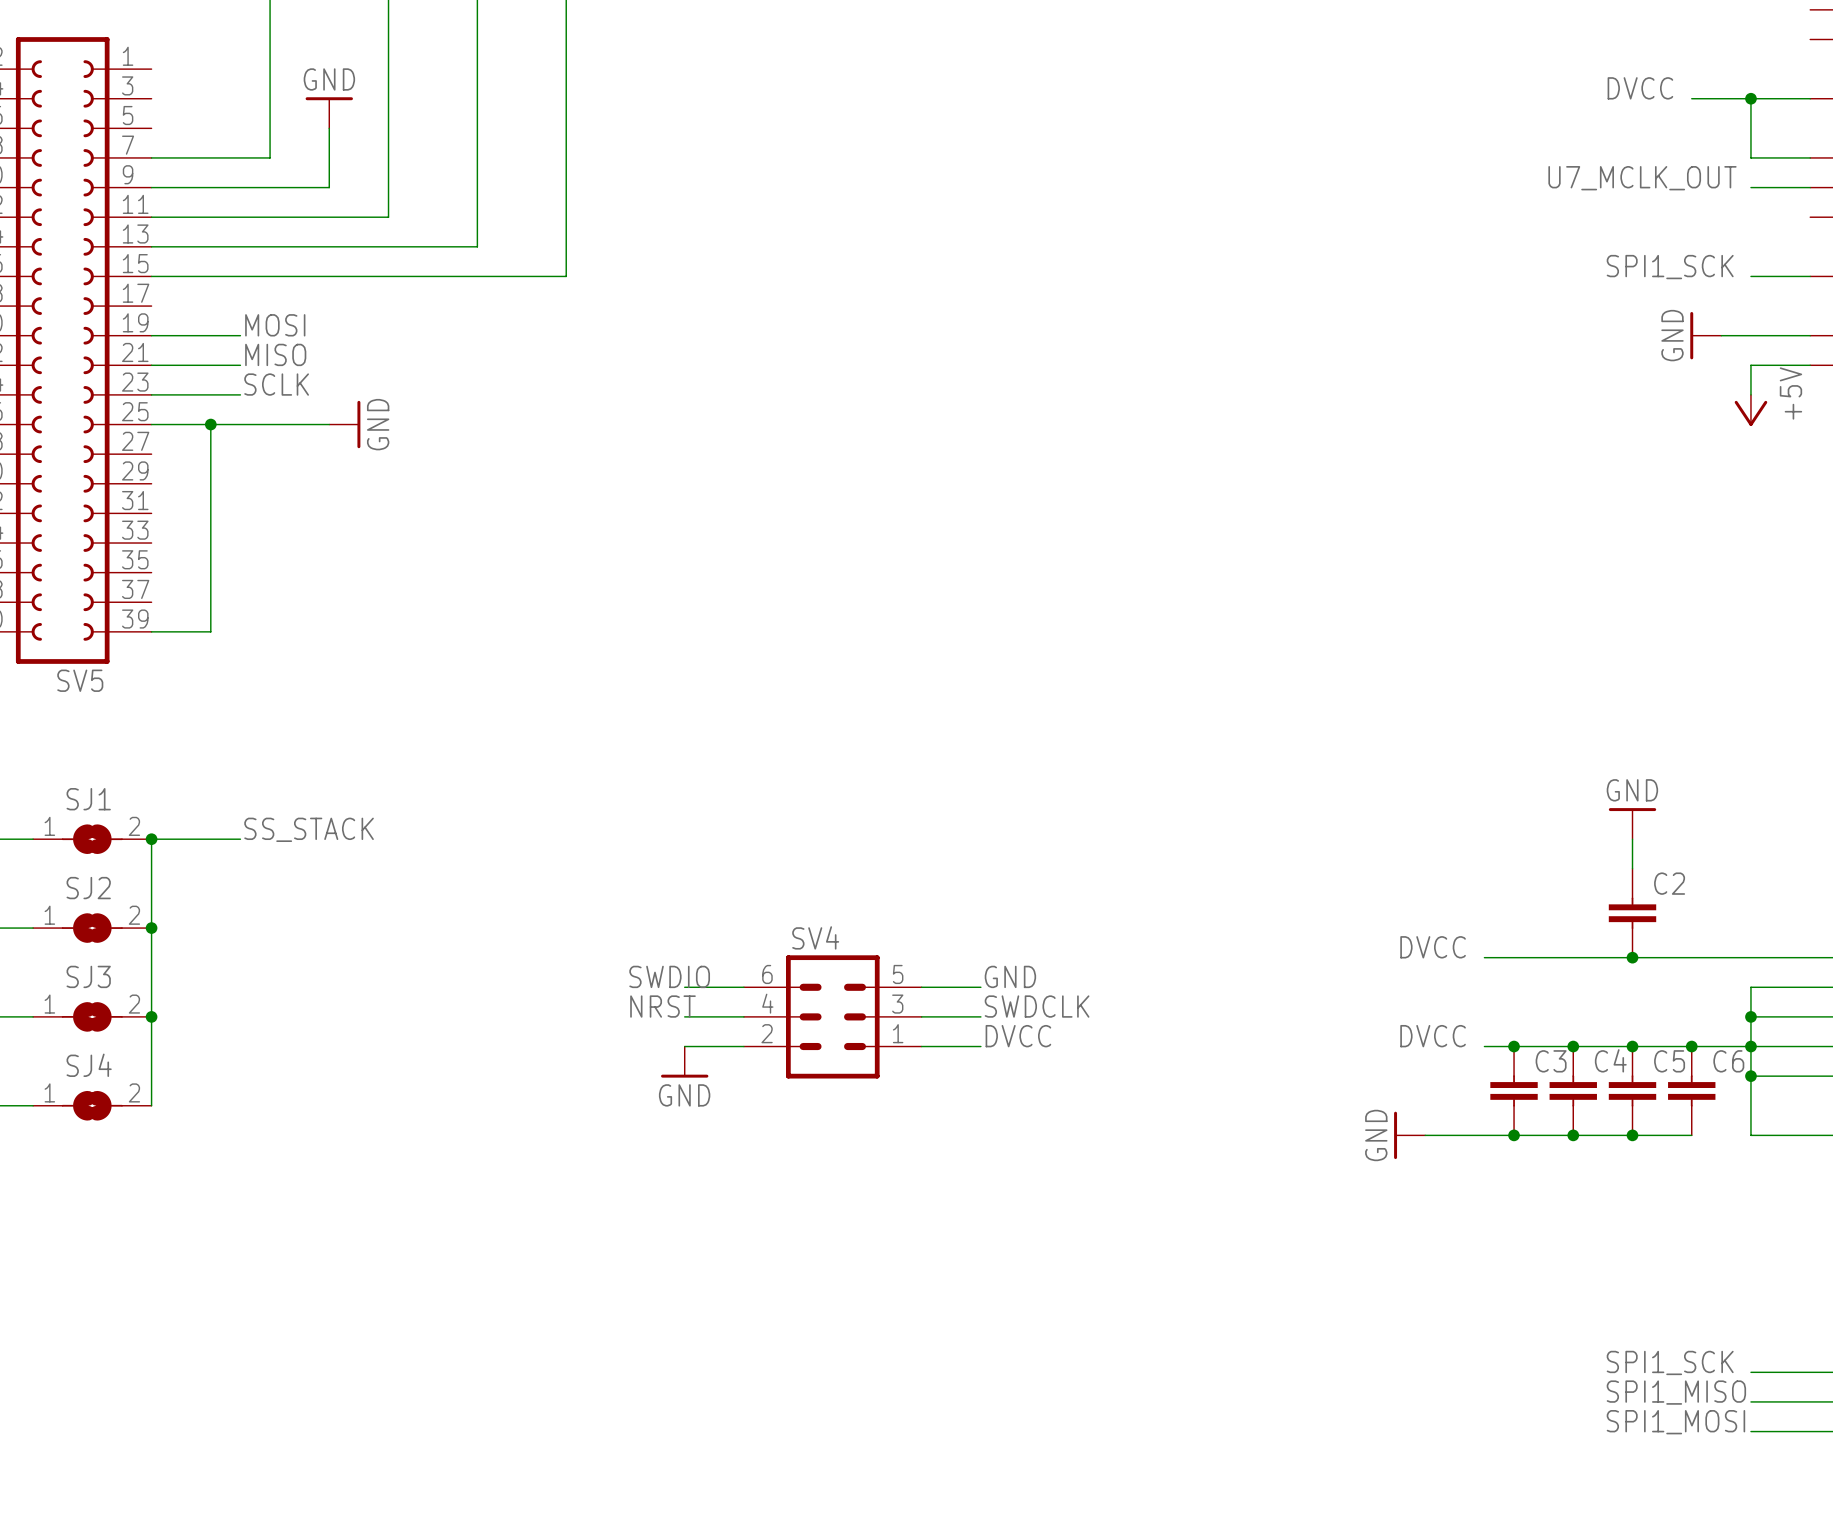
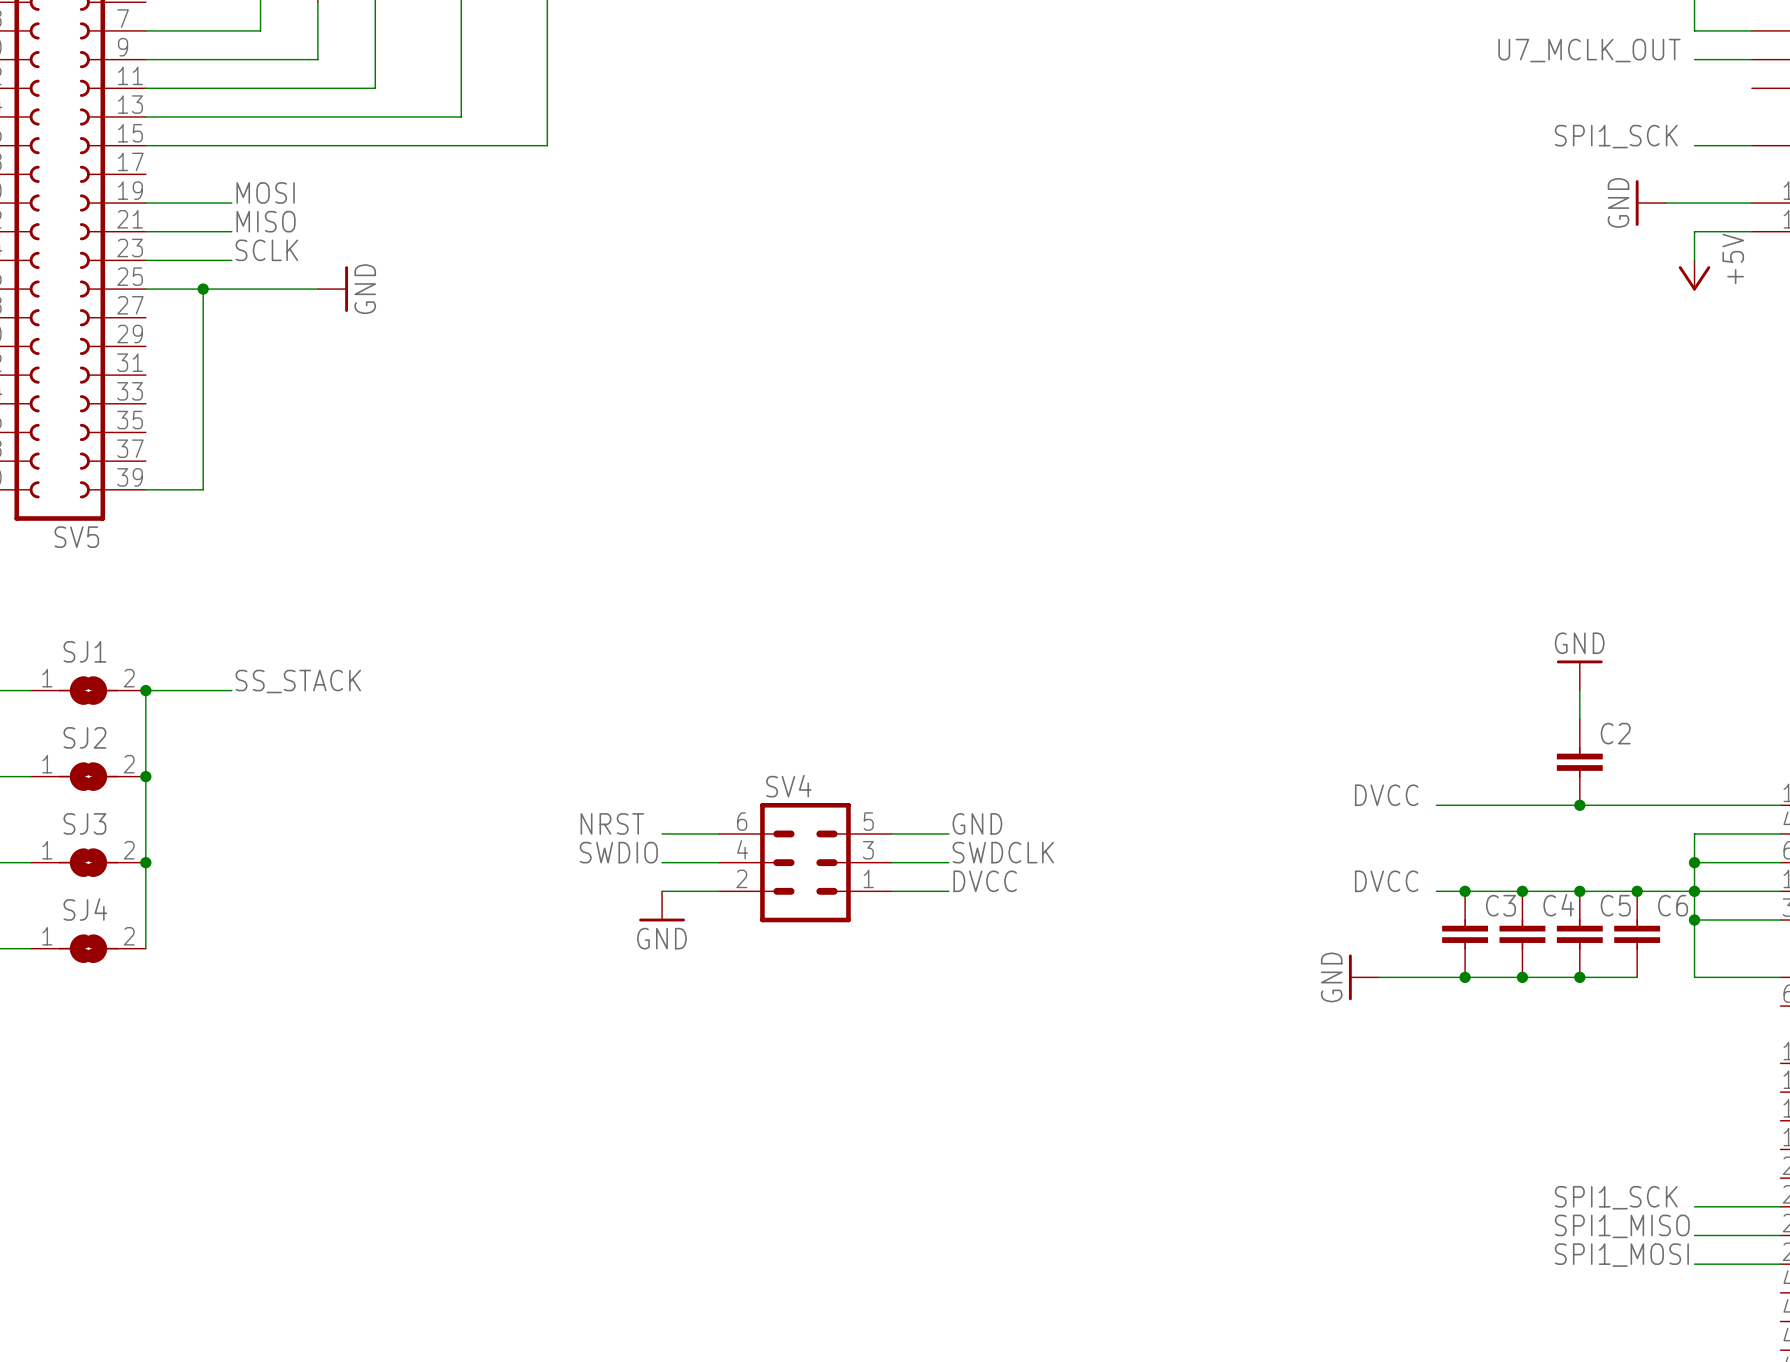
label position: SWDIO (669, 976) -> SWDIO (618, 852)
label position: NRST (662, 1006) -> NRST (612, 823)

